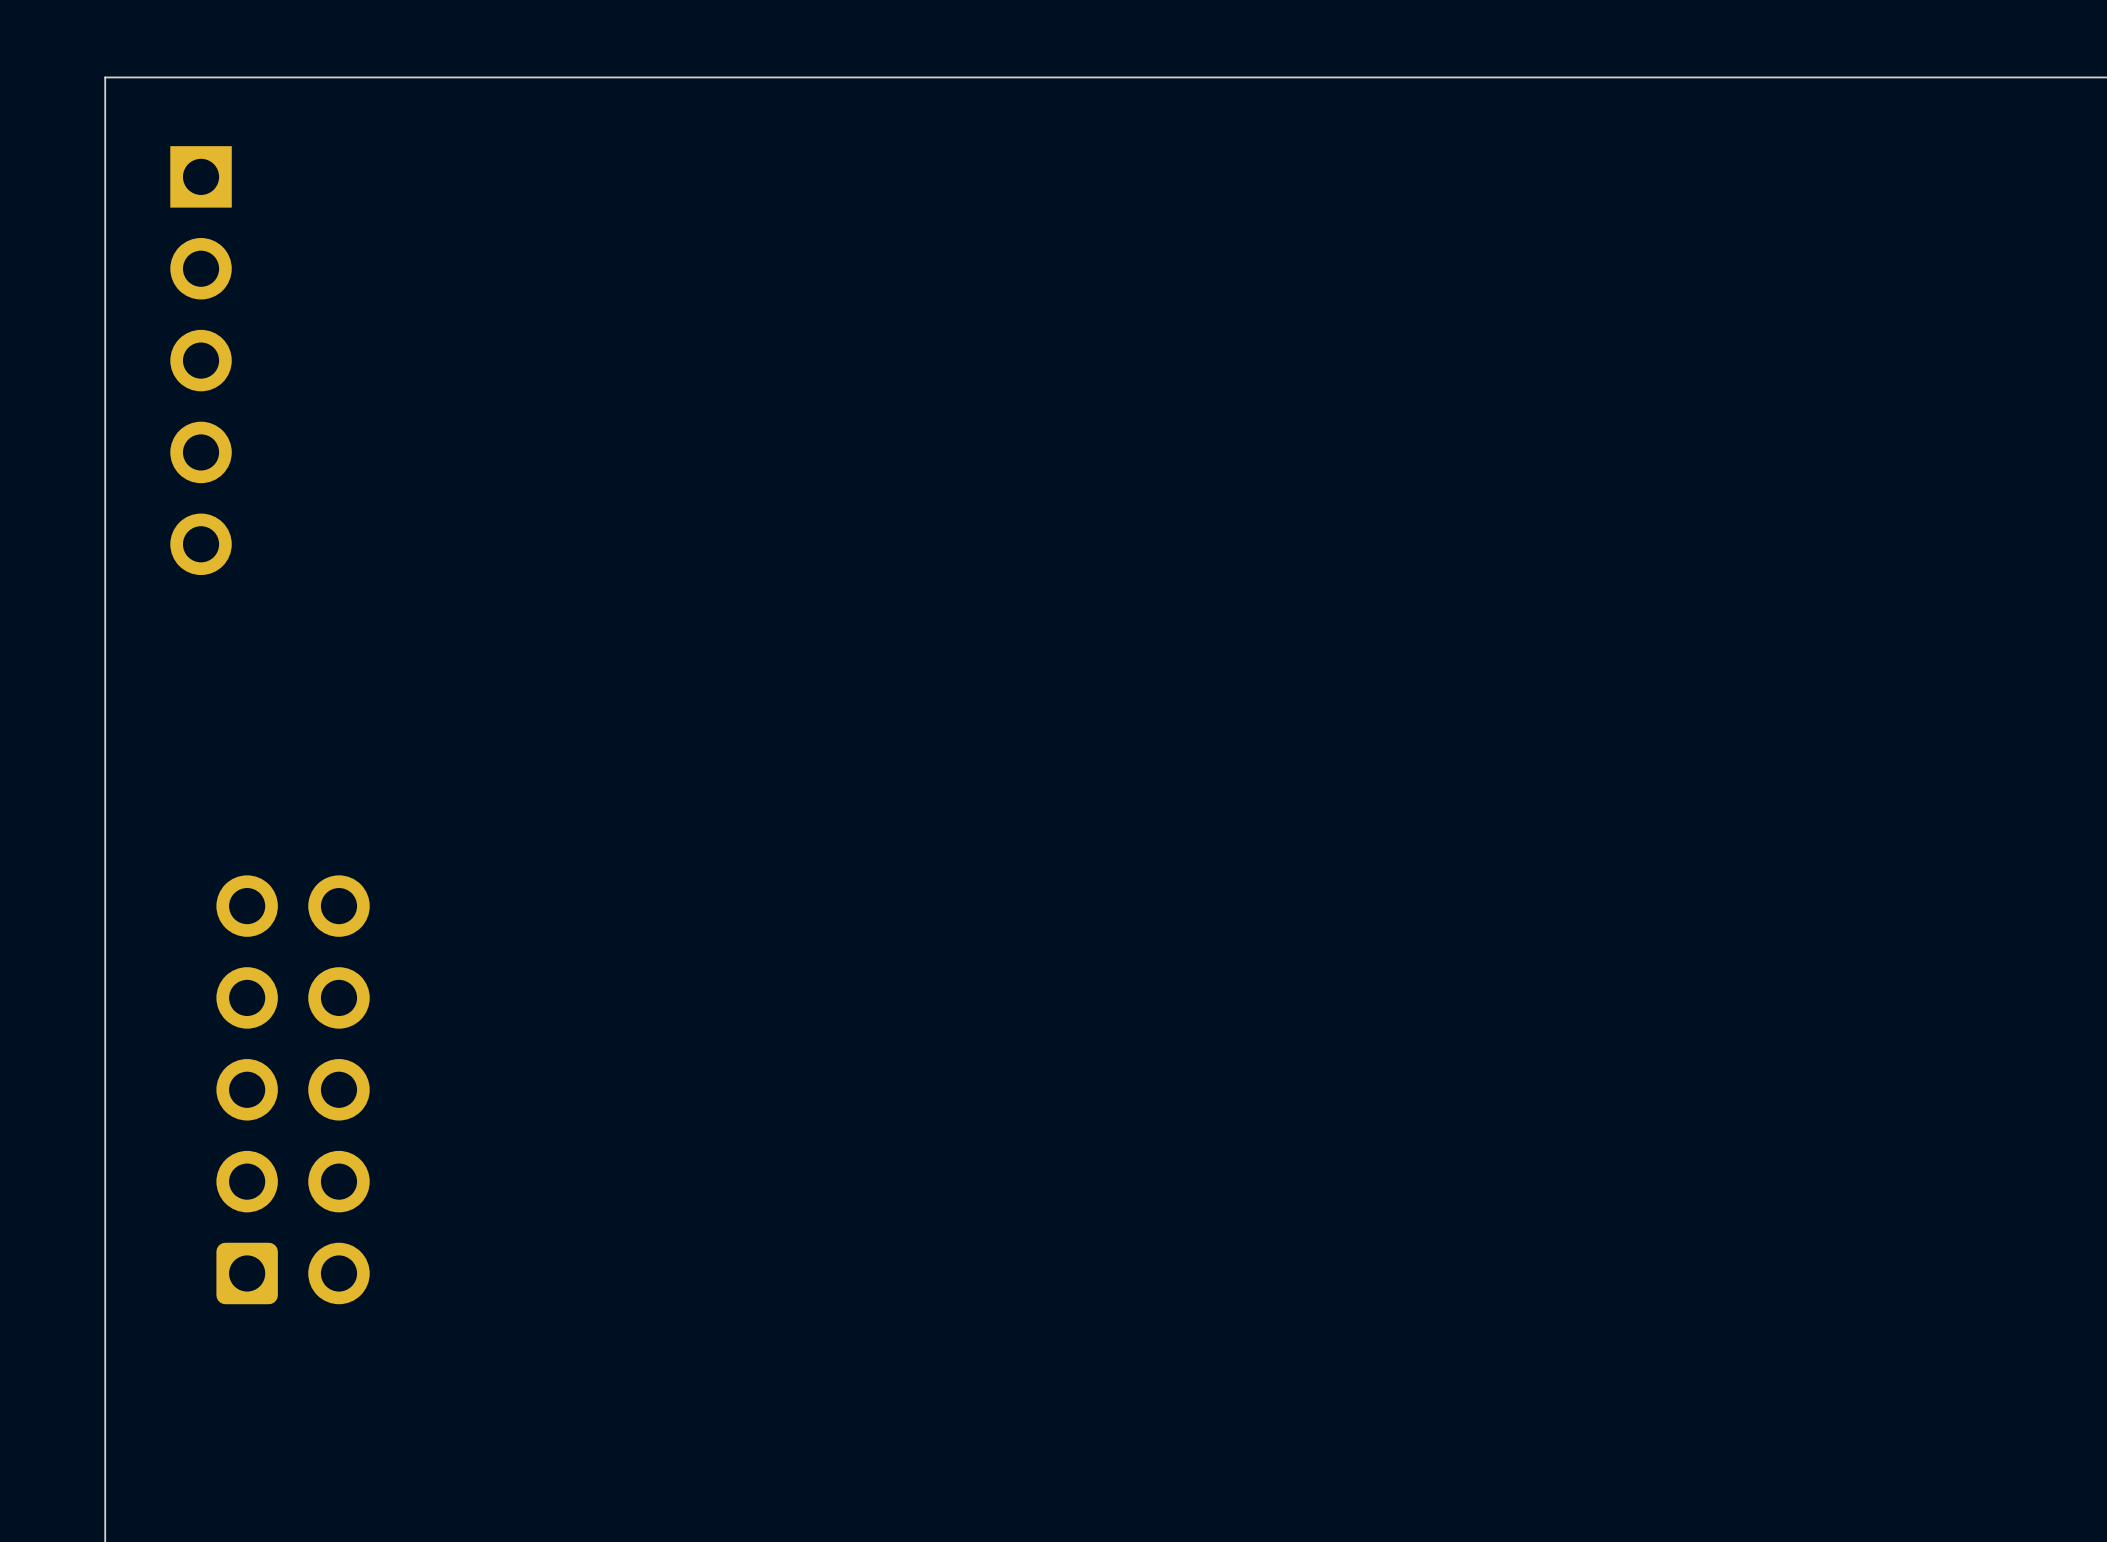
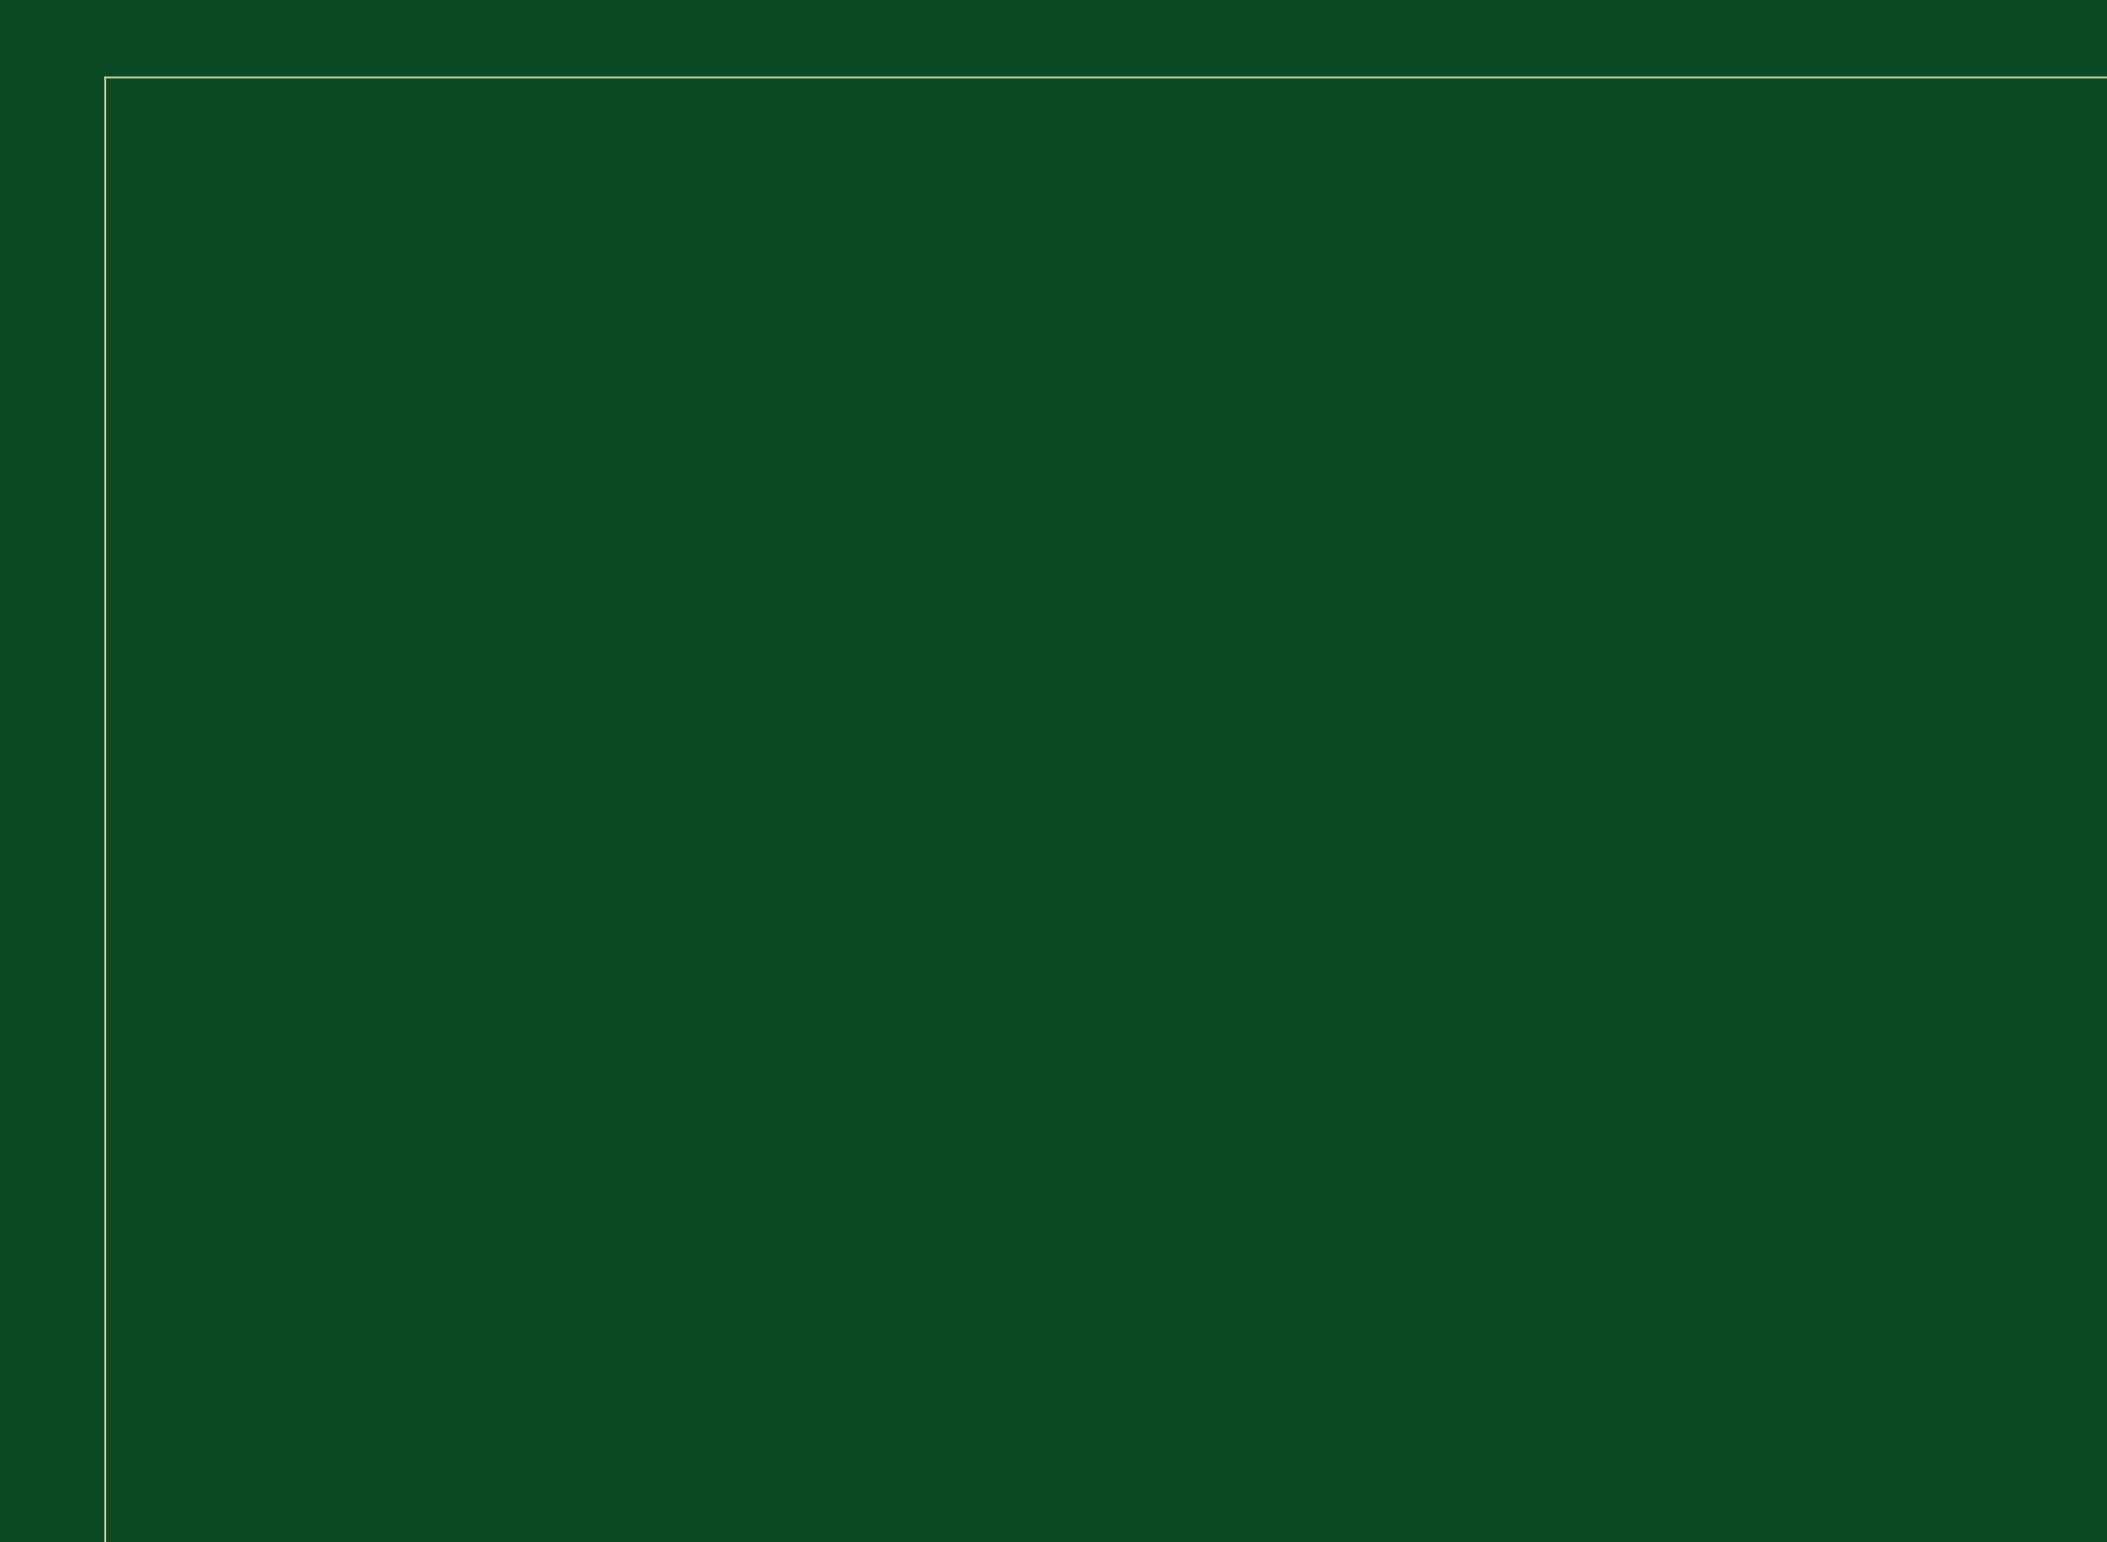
part: (201, 360) -> none
part: (293, 1089) -> none

